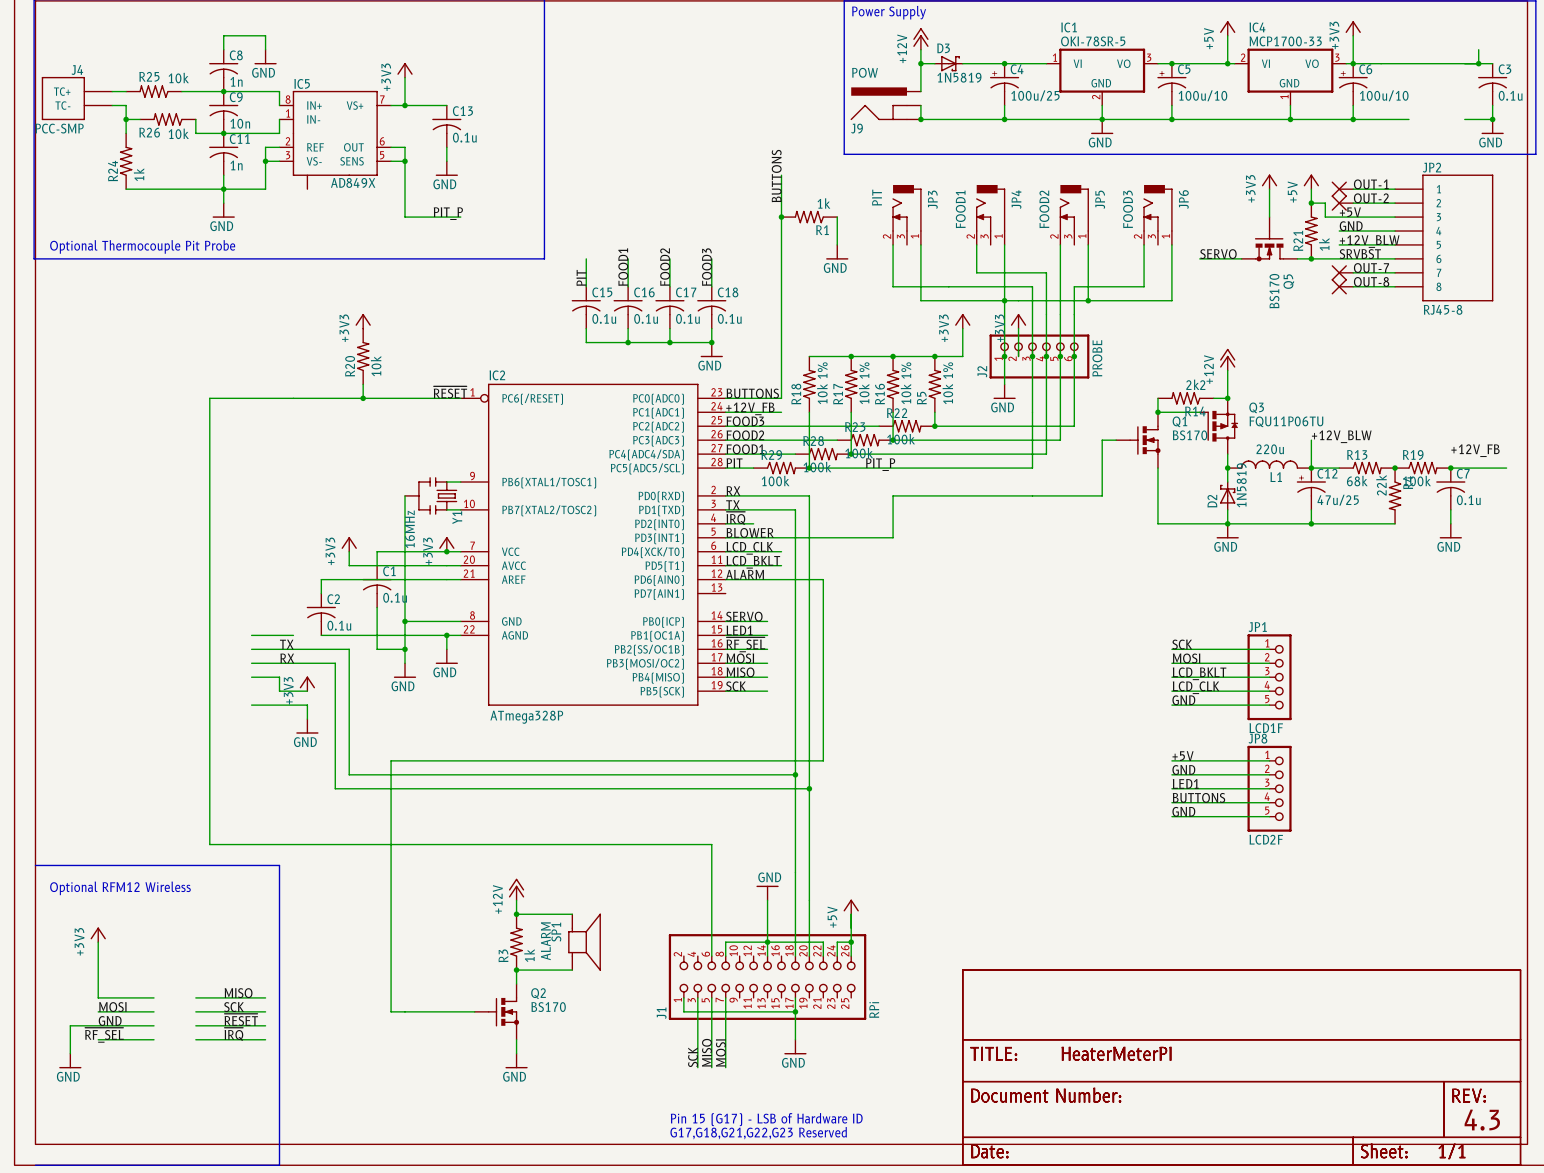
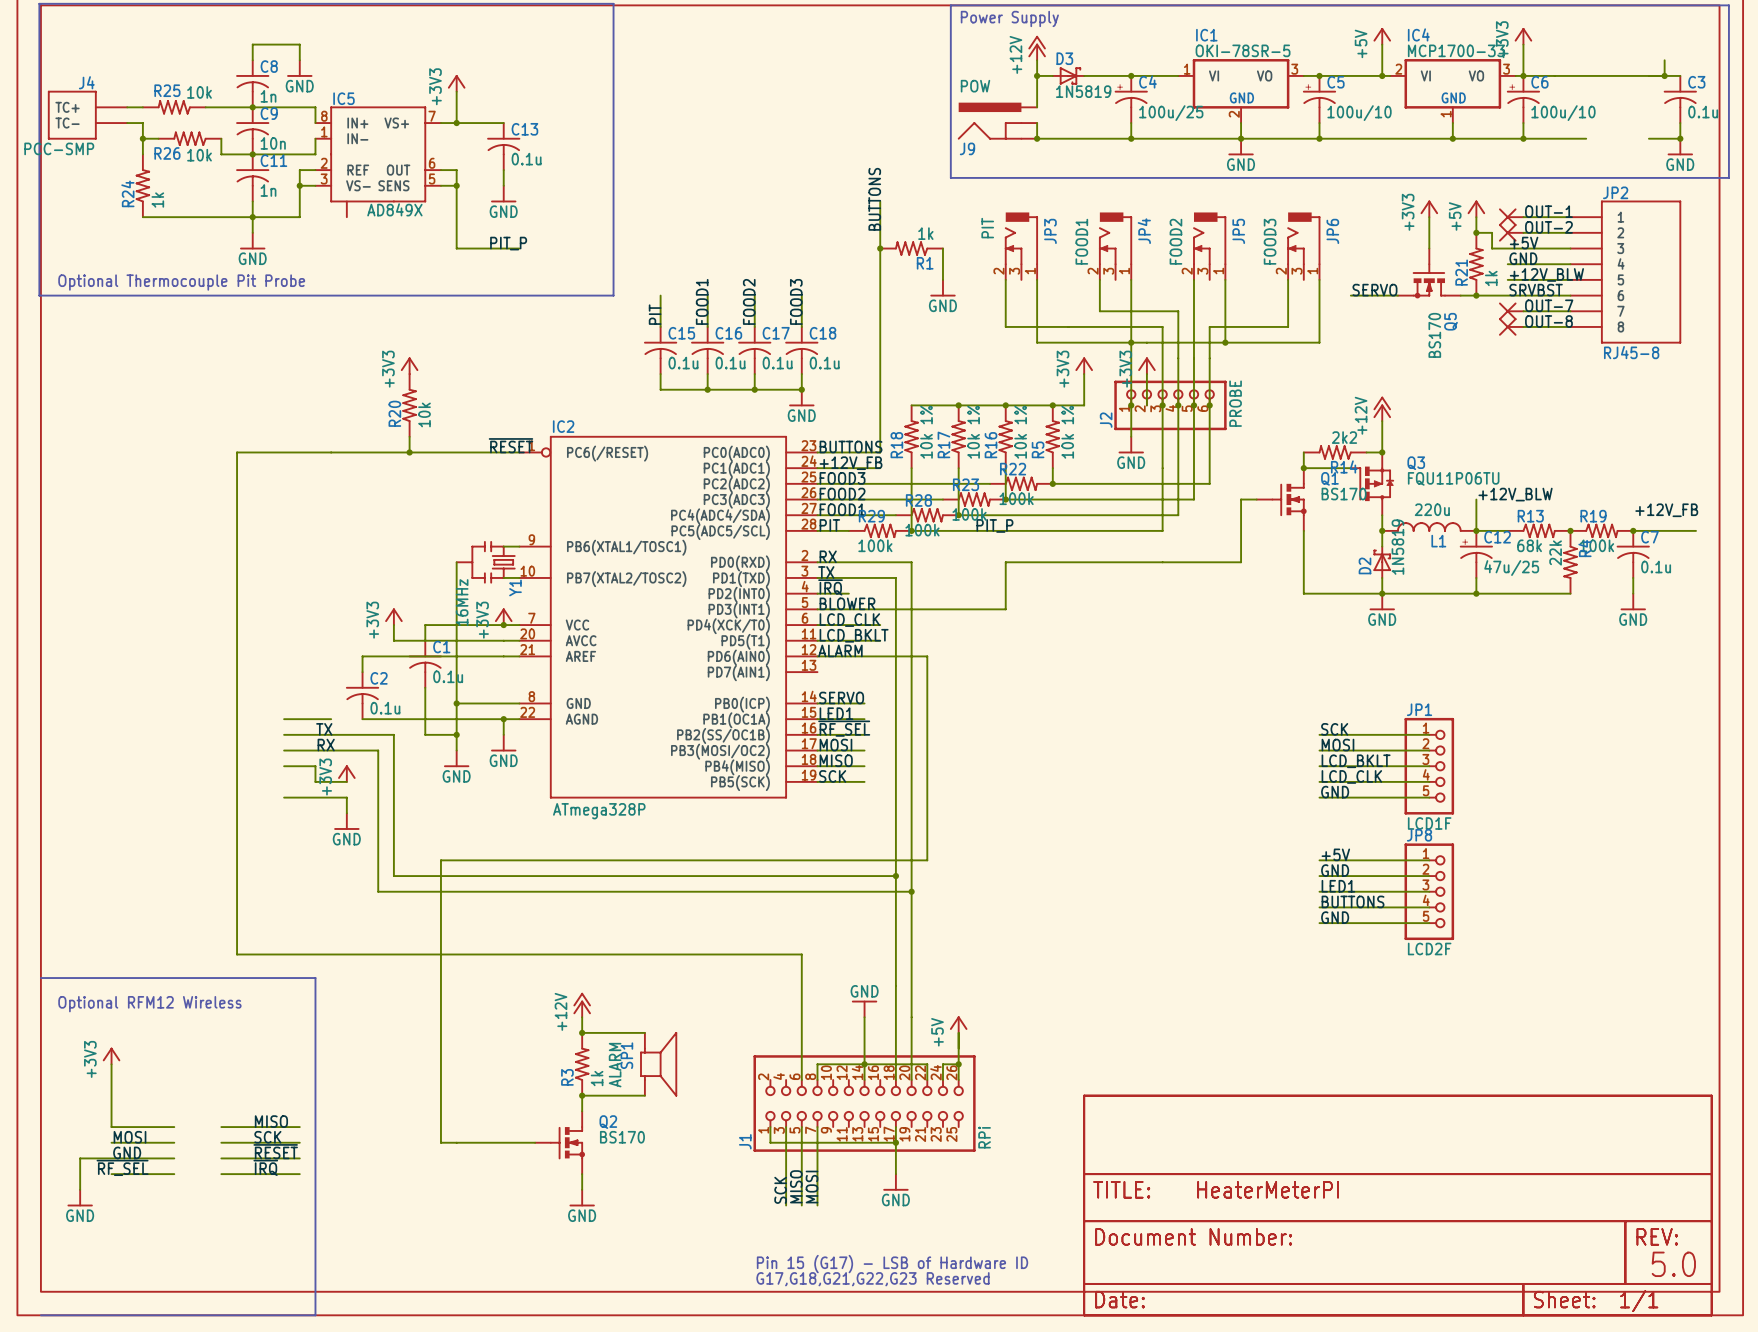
text: 4.3 (1482, 1120) -> 5.0 (1673, 1264)

